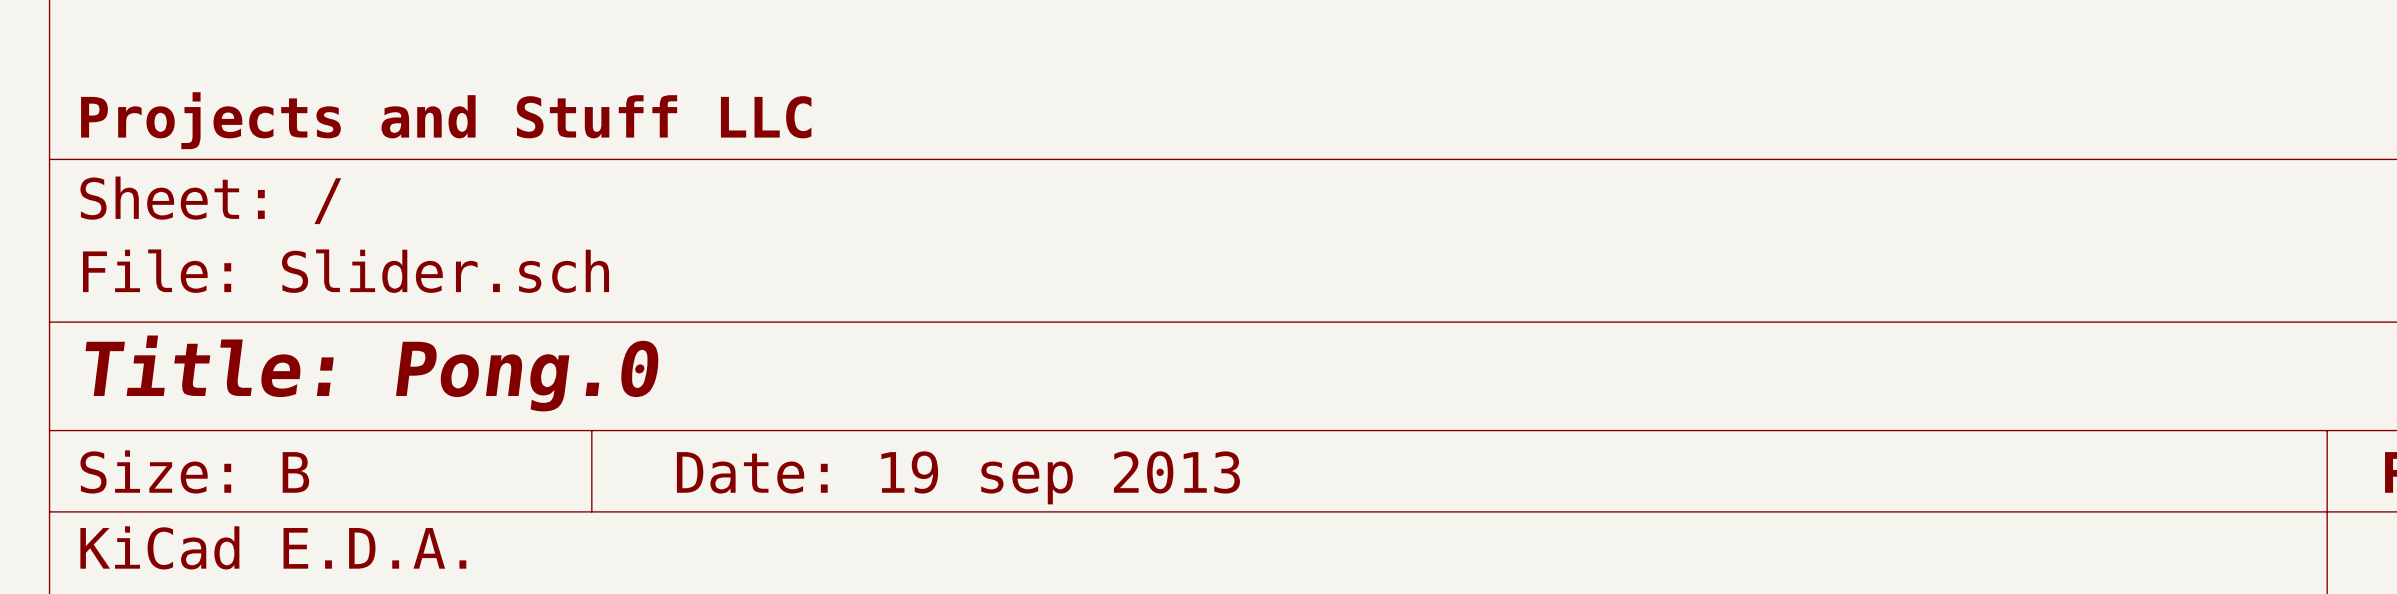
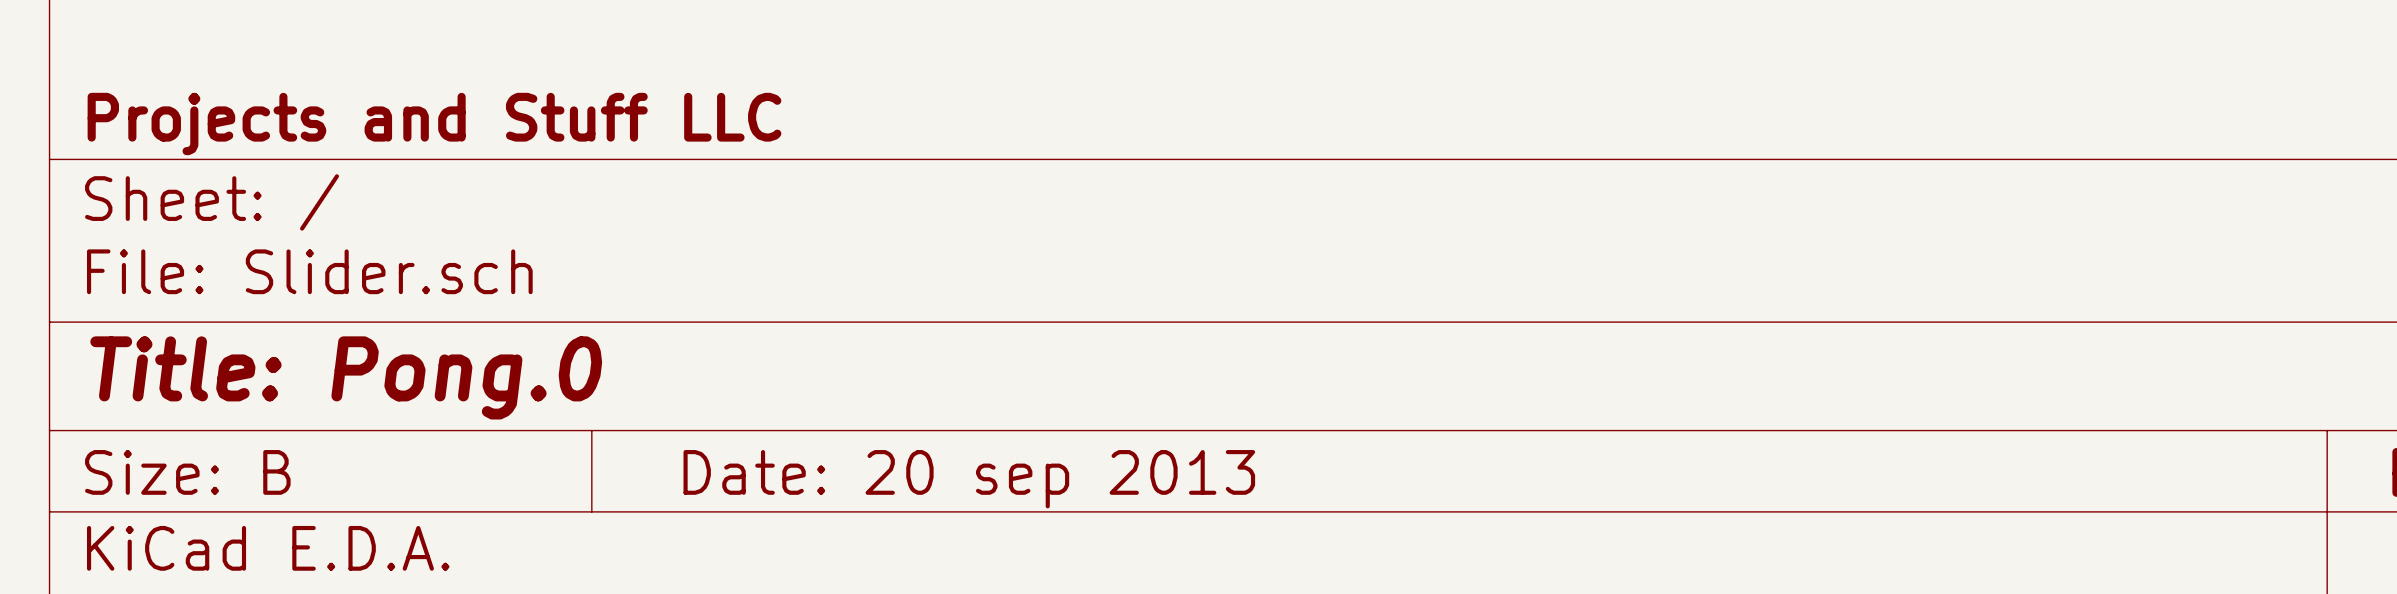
title block: Date: 19 sep 2013 (958, 477) -> Date: 20 sep 2013 (969, 479)

